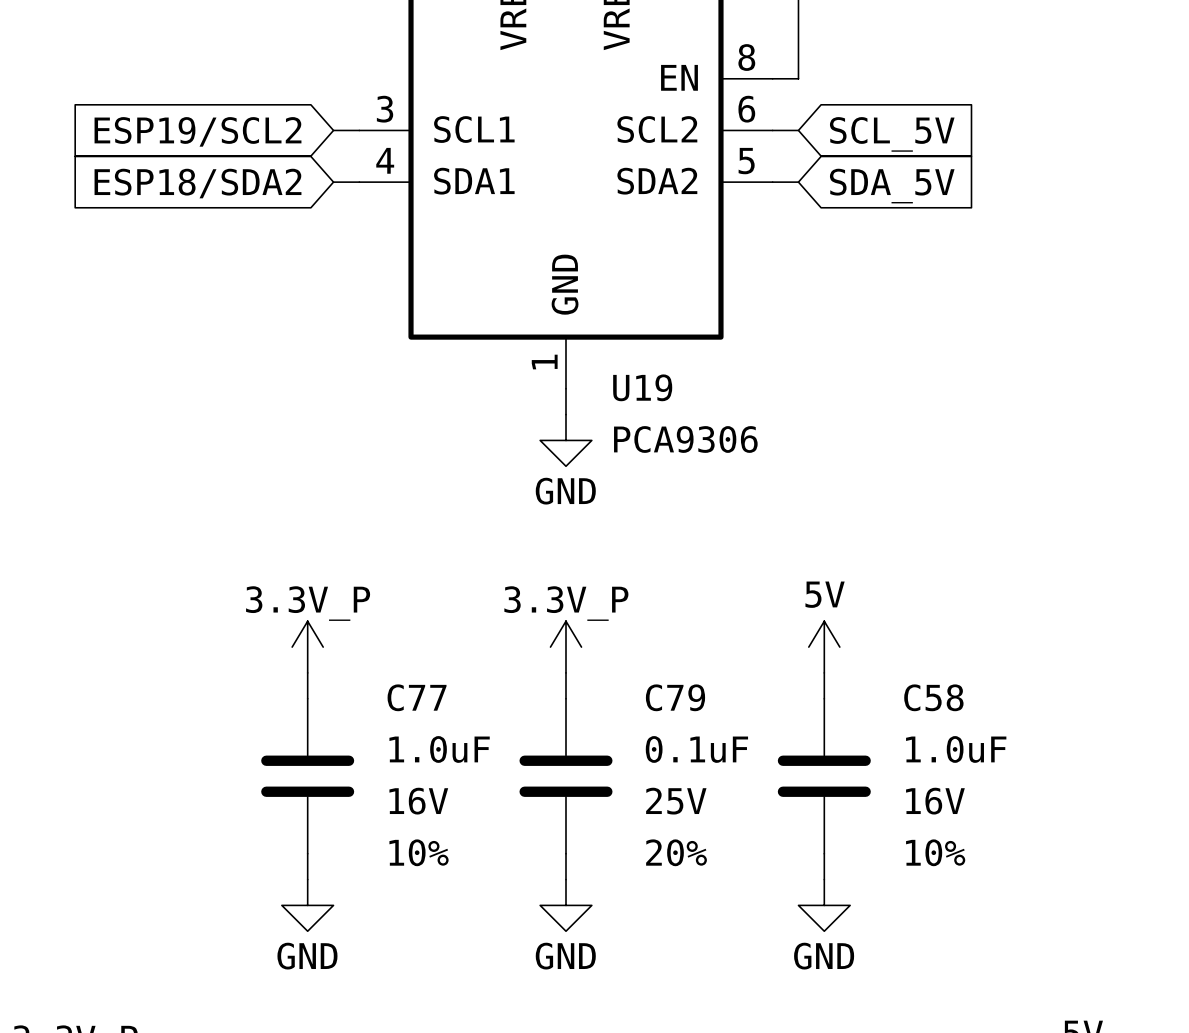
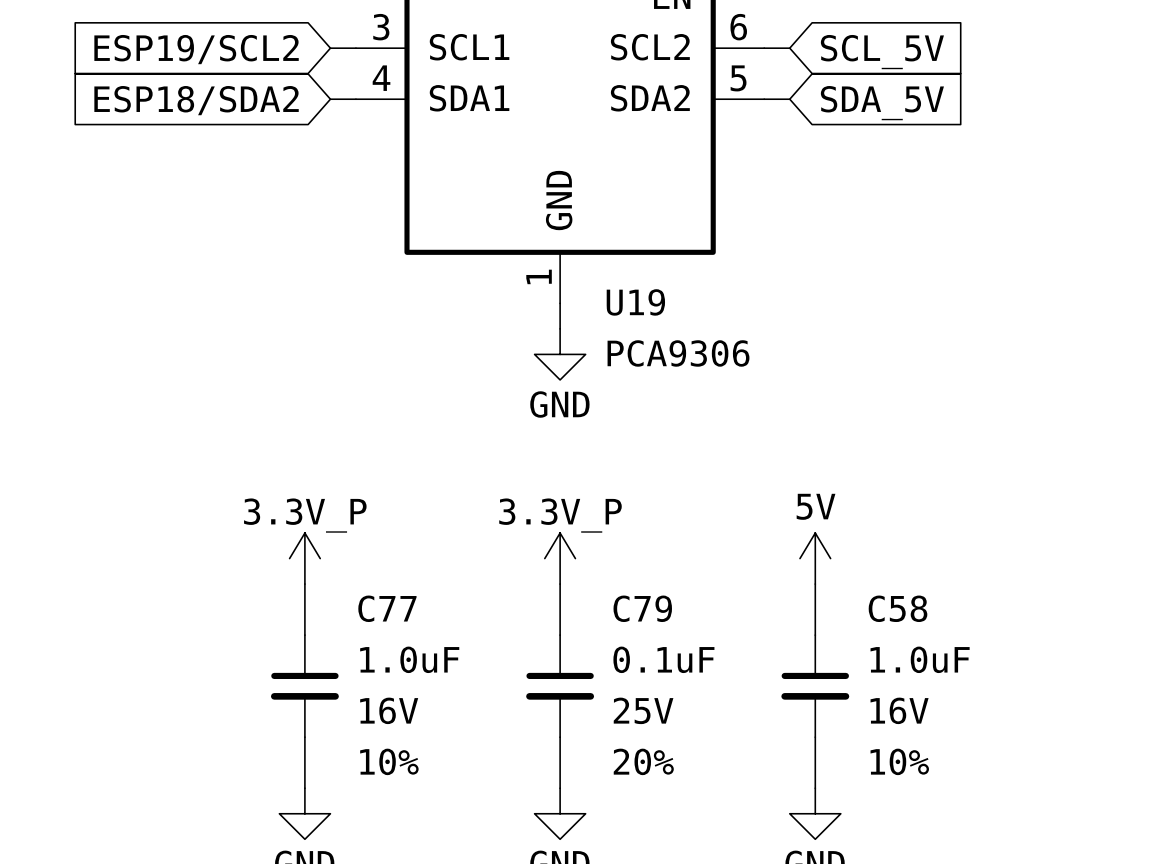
C77 symbol: [261, 698, 355, 854] -> [270, 635, 339, 738]
C79 symbol: [519, 698, 613, 854] -> [526, 635, 595, 738]
C58 symbol: [777, 698, 871, 854] -> [781, 635, 850, 738]

